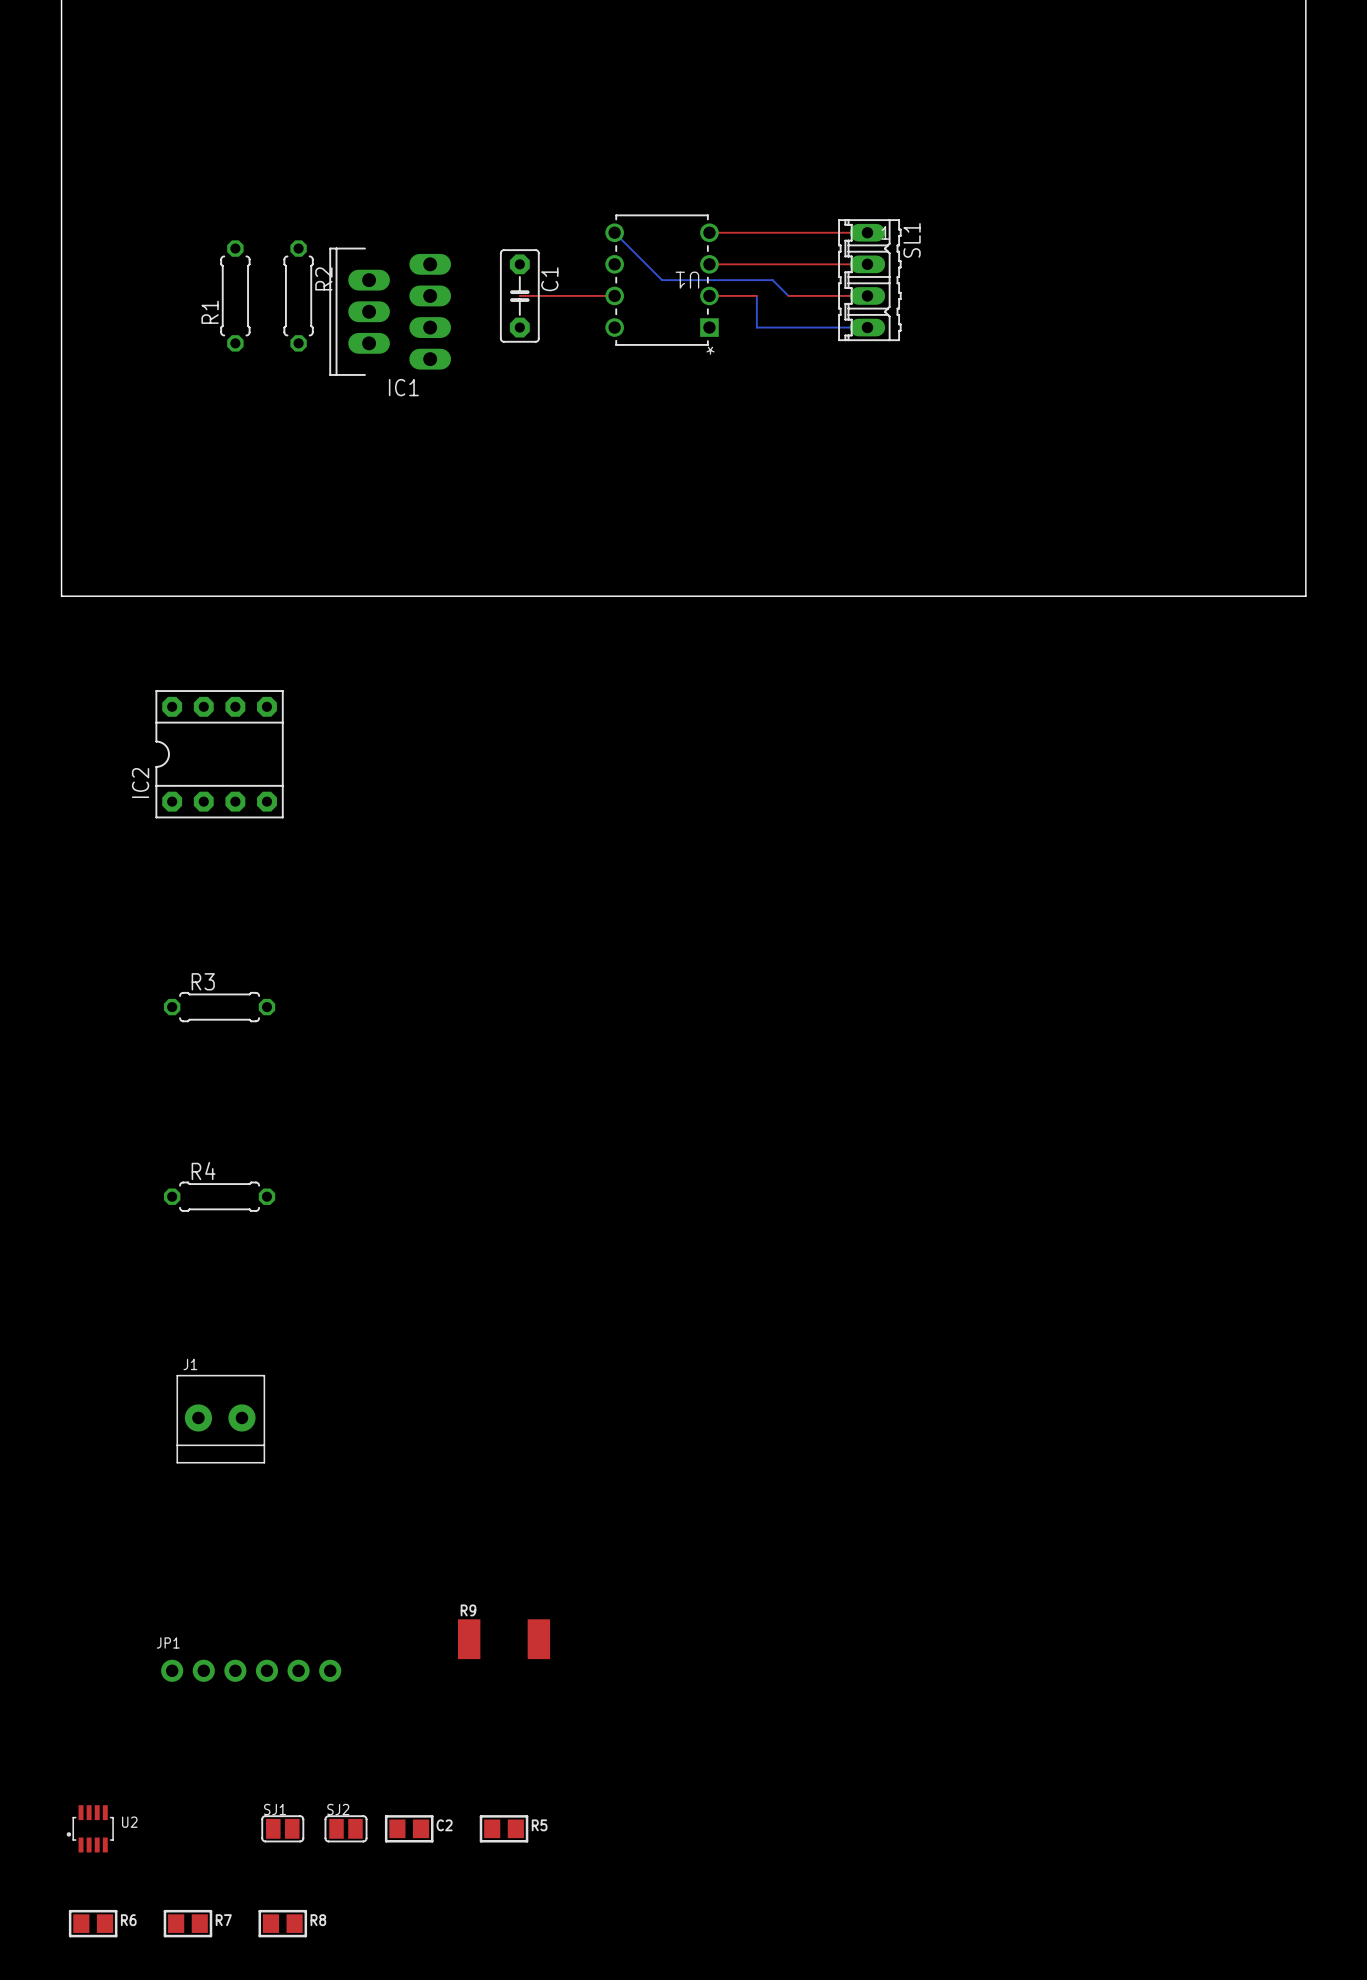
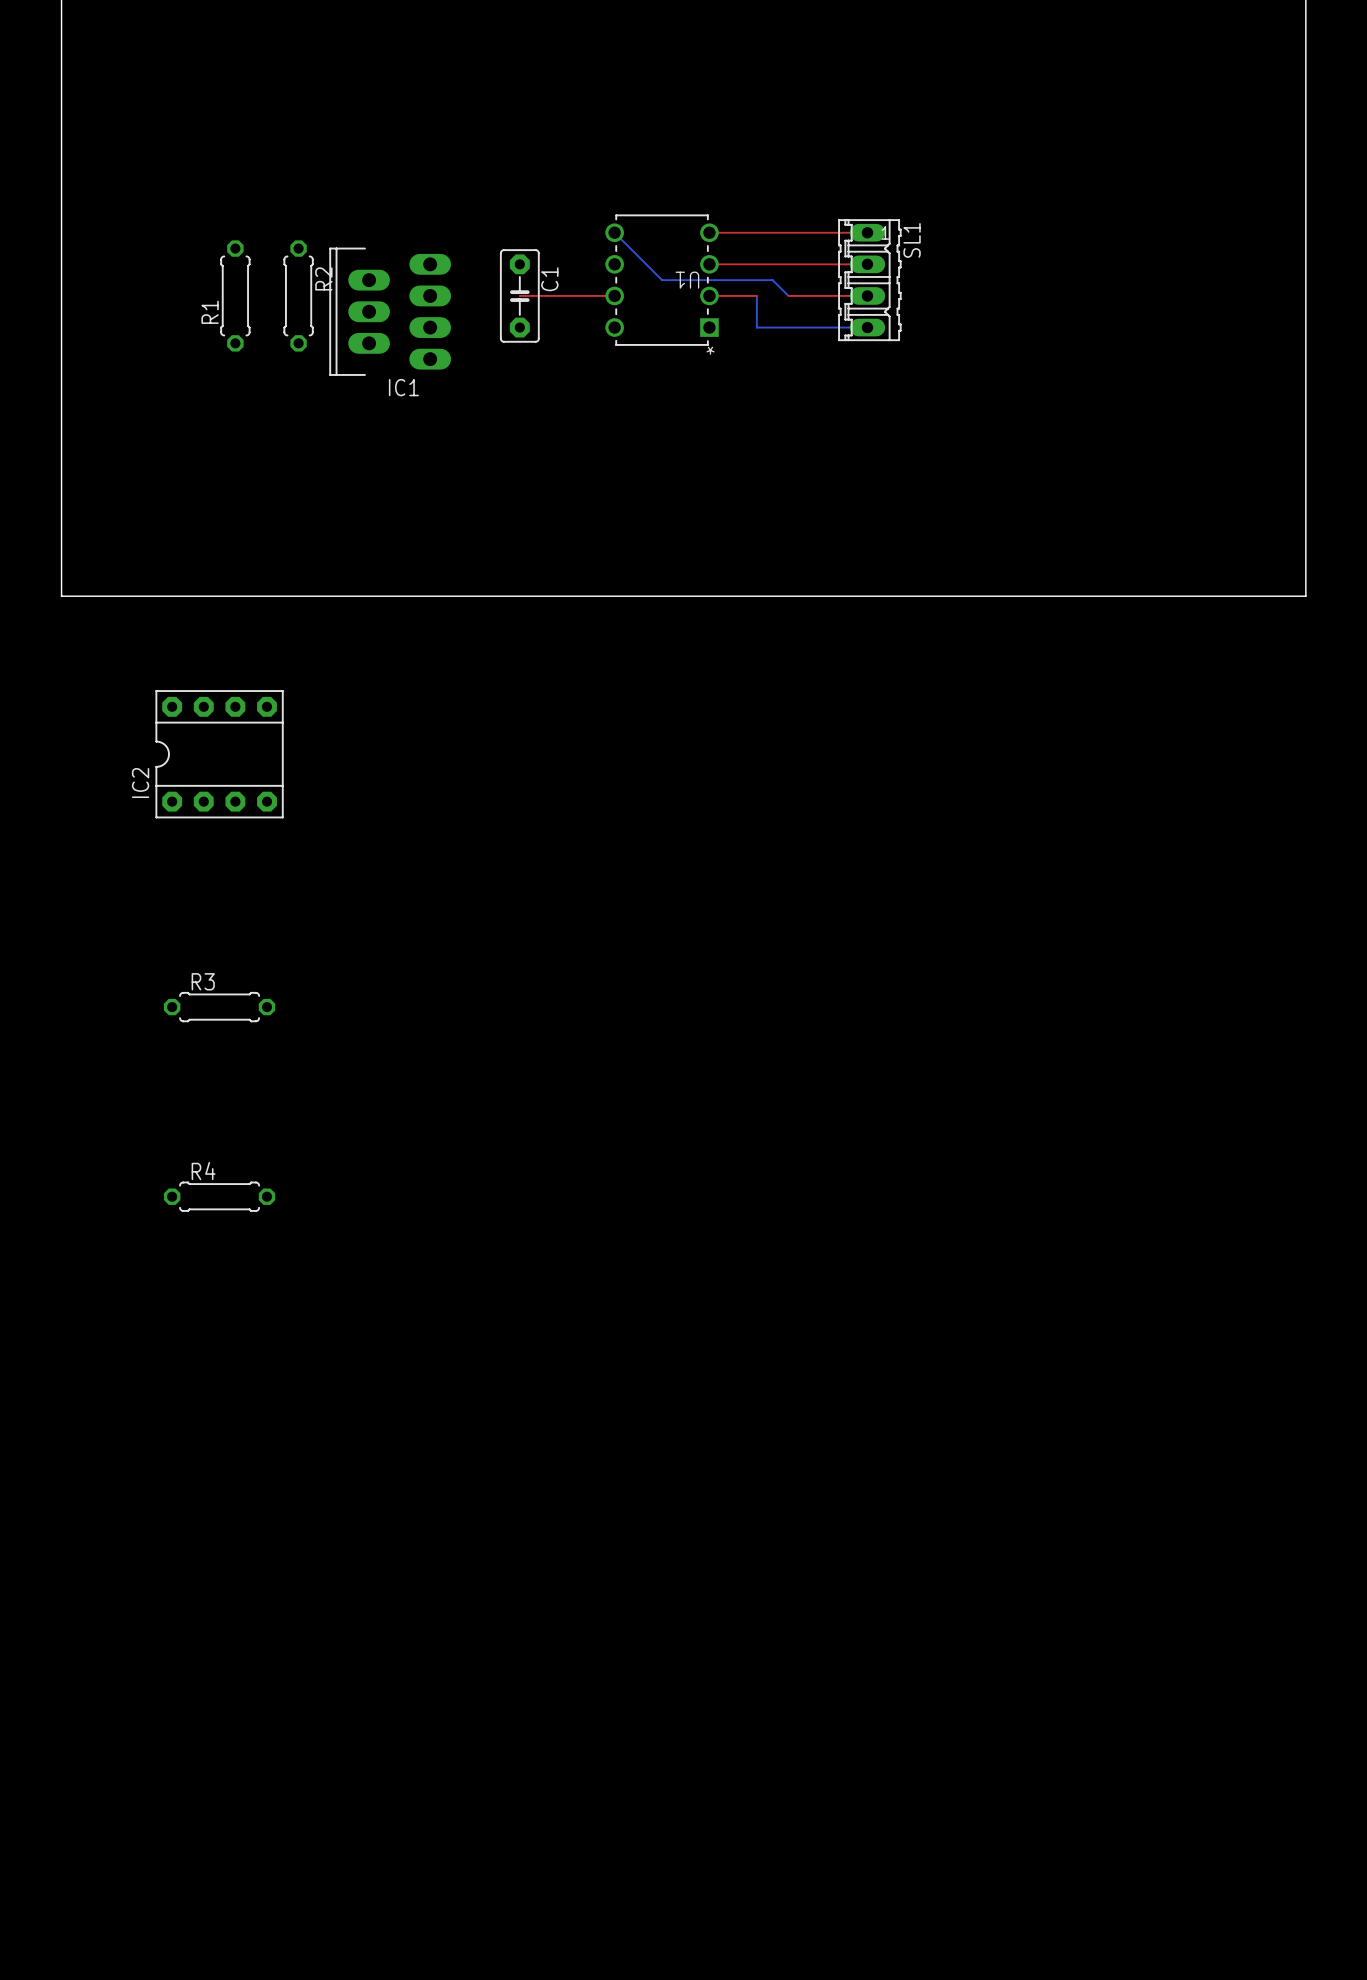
J1: (220, 1419) -> none
R9: (504, 1639) -> none
JP1: (251, 1670) -> none
U2: (90, 1828) -> none
SJ1: (282, 1828) -> none
SJ2: (346, 1828) -> none
C2: (409, 1828) -> none
R5: (504, 1828) -> none
R6: (93, 1923) -> none
R7: (187, 1923) -> none
R8: (282, 1923) -> none

